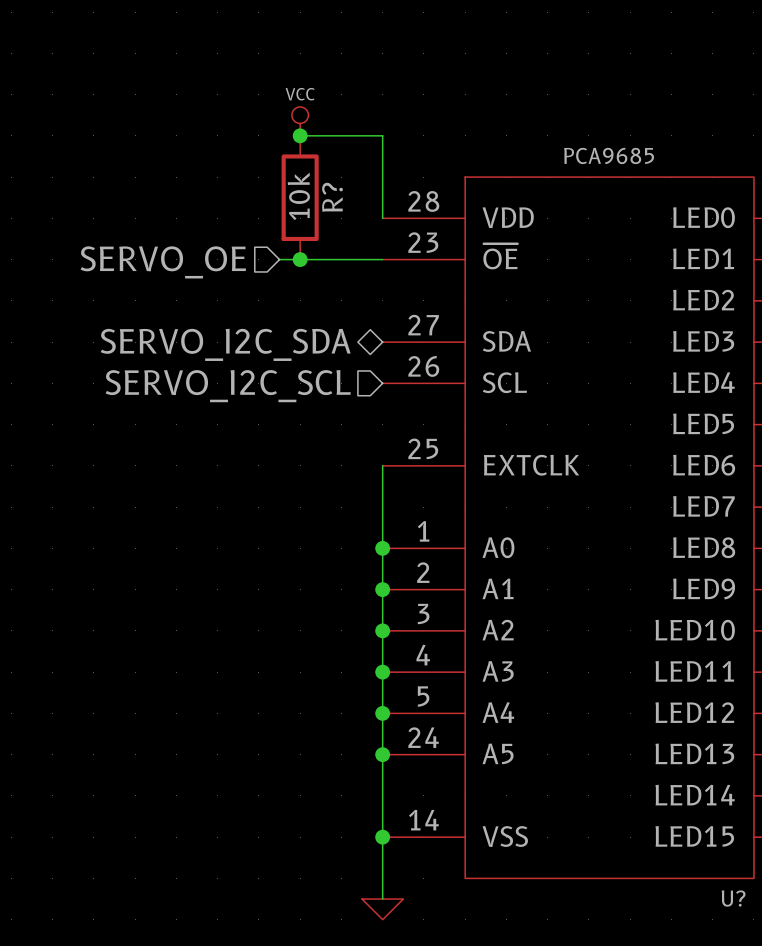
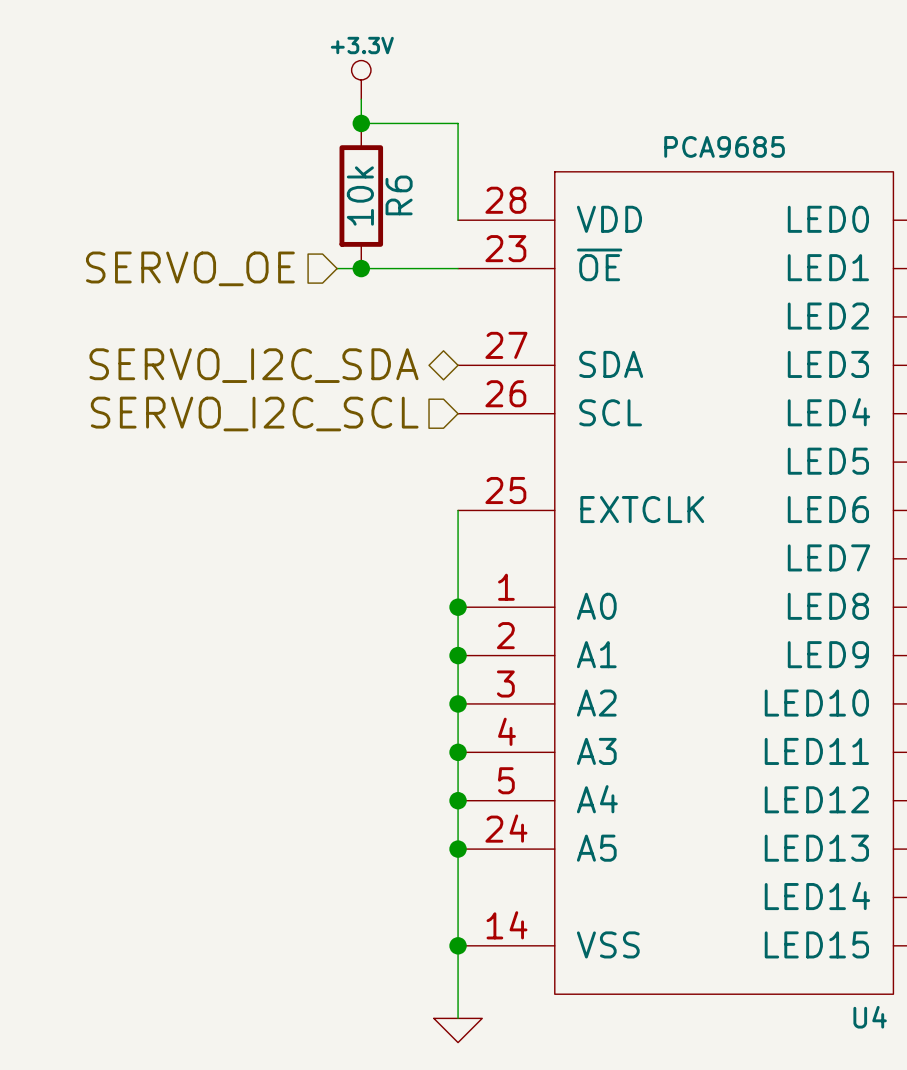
power symbol: none -> +3.3V (361, 79)
power symbol: VCC (300, 121) -> none
R? name: R? (332, 197) -> R6 (399, 195)
U? name: U? (733, 898) -> U4 (870, 1017)

